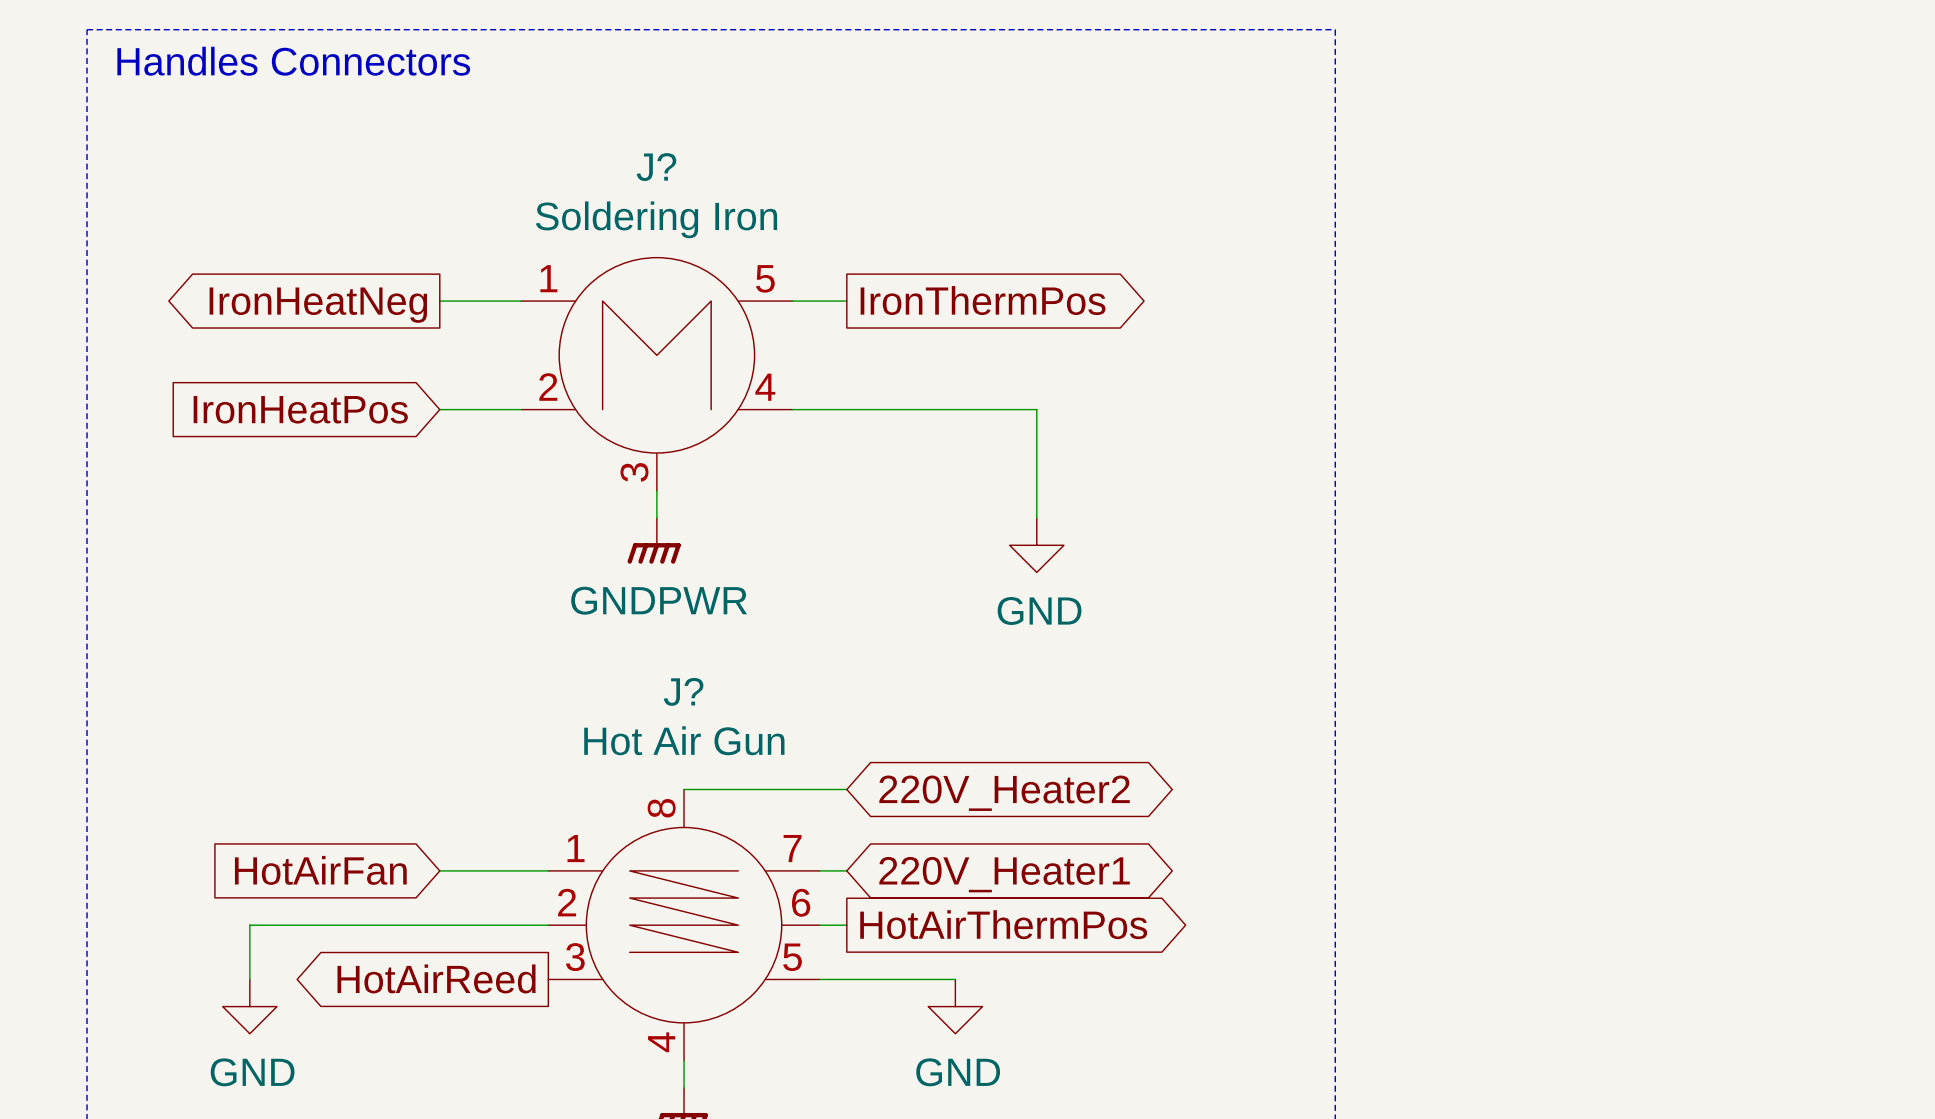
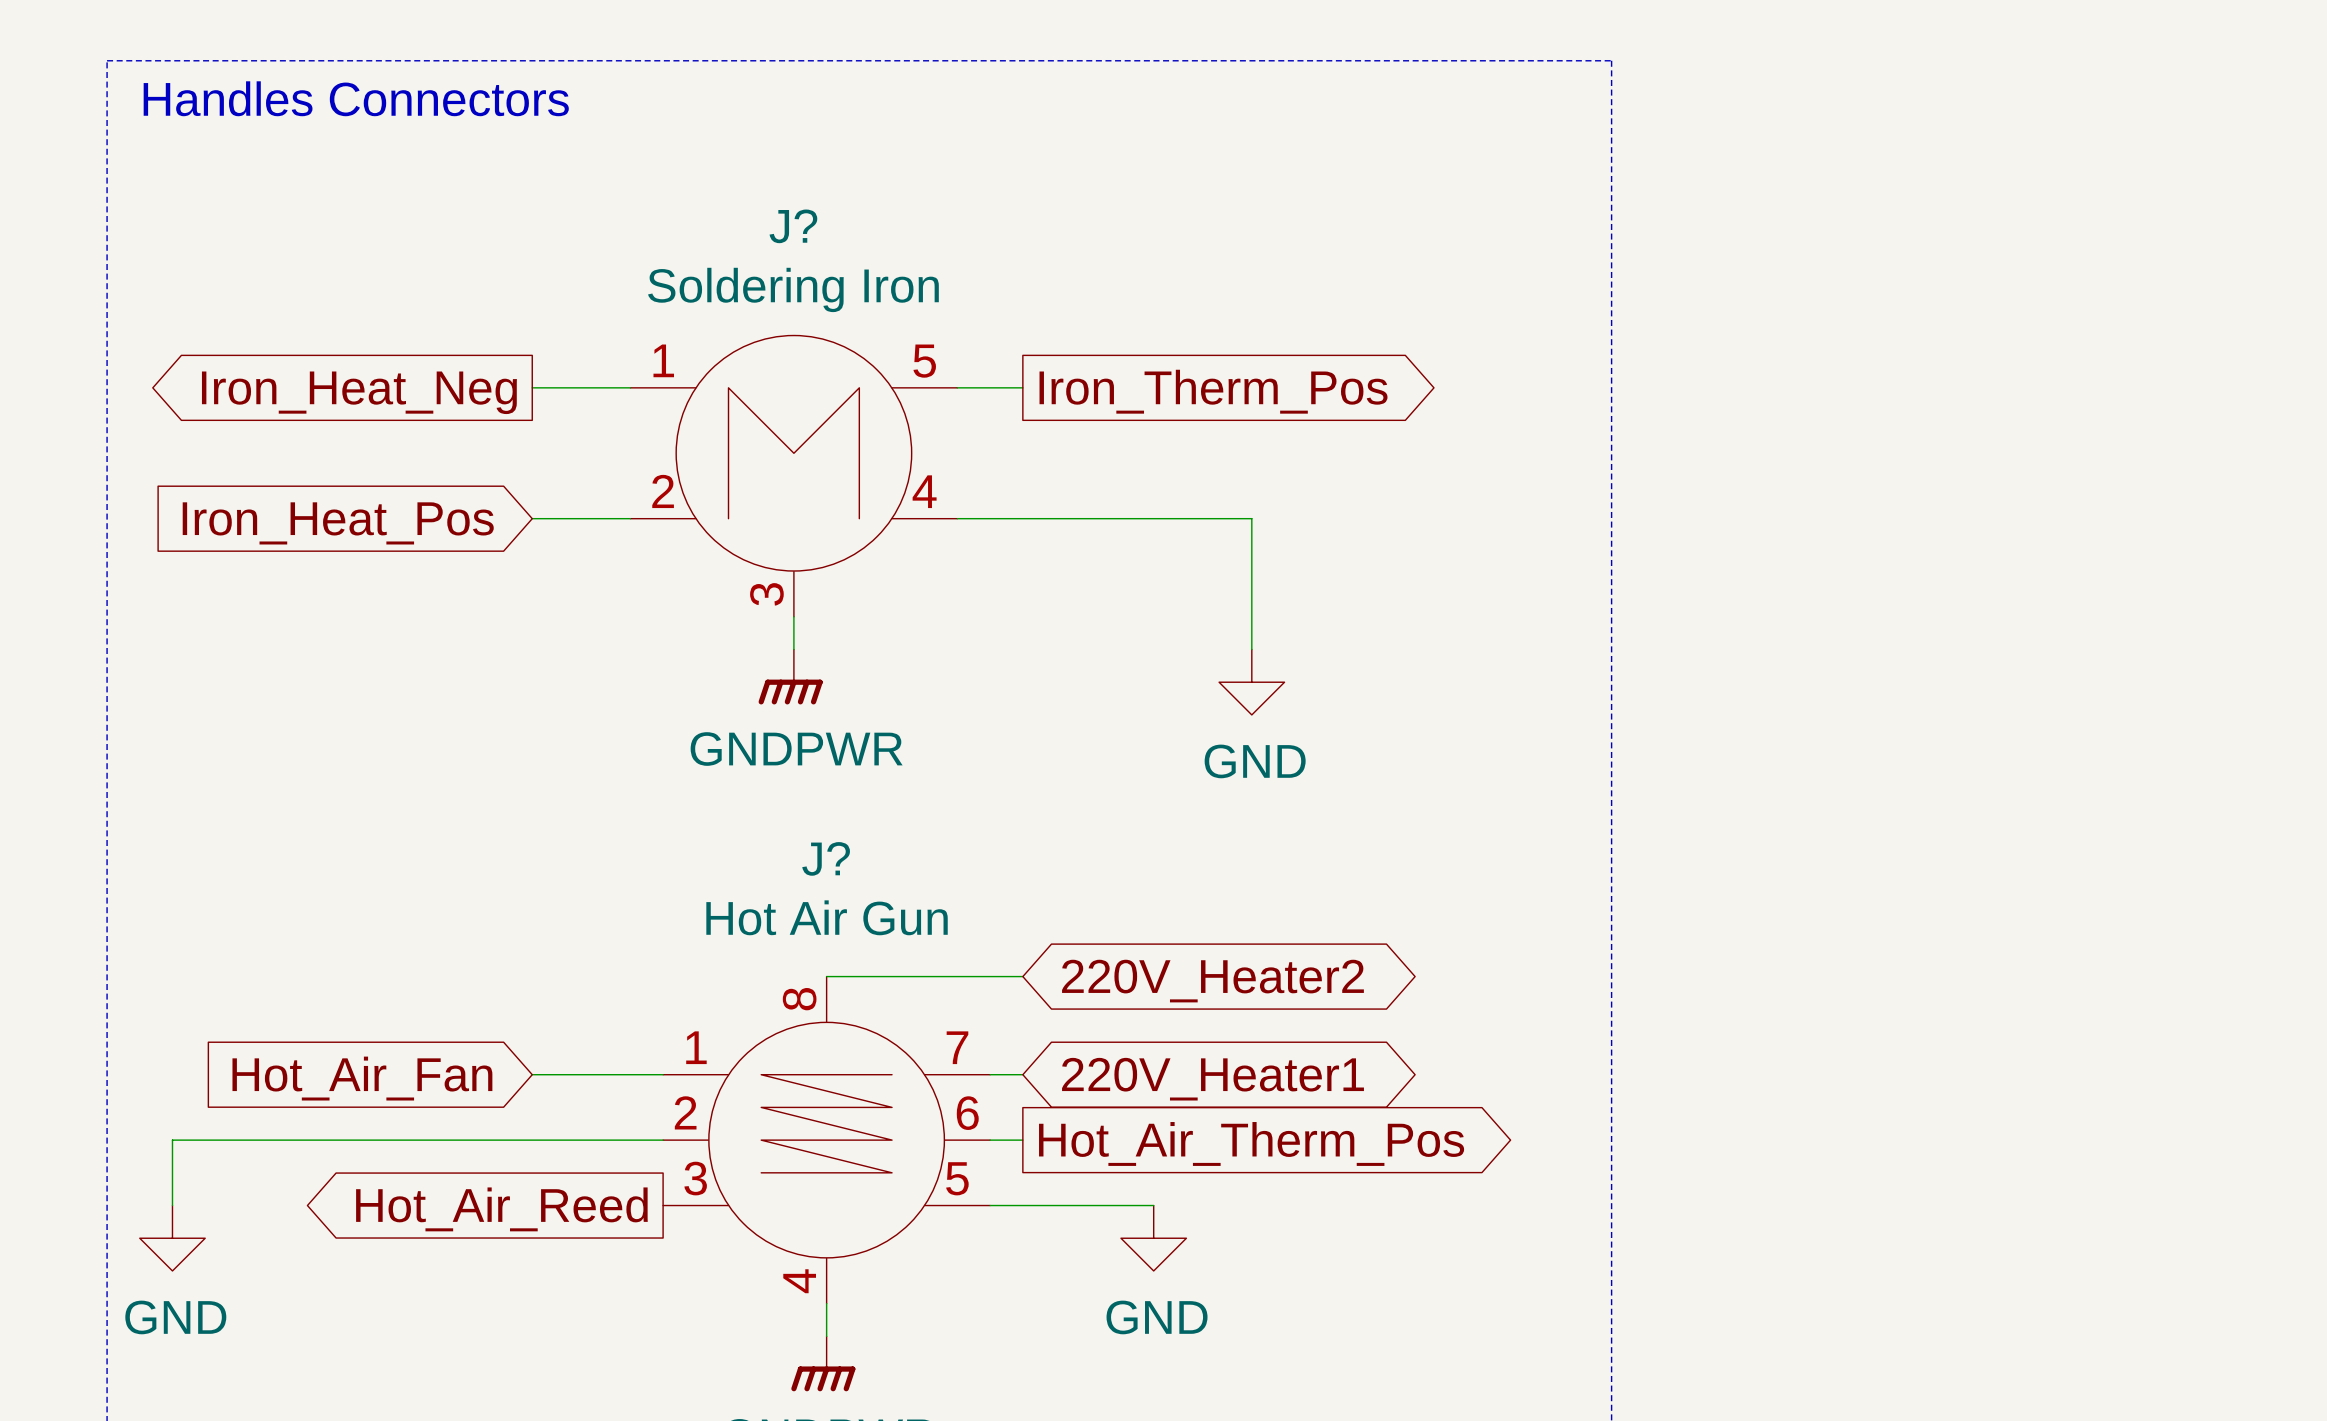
global label: IronThermPos (983, 300) -> Iron_Therm_Pos (1213, 391)
global label: IronHeatNeg (318, 305) -> Iron_Heat_Neg (359, 392)
global label: IronHeatPos (300, 409) -> Iron_Heat_Pos (338, 523)
global label: HotAirFan (320, 870) -> Hot_Air_Fan (362, 1078)
global label: HotAirThermPos (1003, 924) -> Hot_Air_Therm_Pos (1251, 1143)
wire: (249, 925) (249, 979) -> (303, 1140) (172, 1140) (172, 1205)
global label: HotAirReed (436, 978) -> Hot_Air_Reed (501, 1209)
power symbol position: GND (249, 1006) -> GND (172, 1238)

